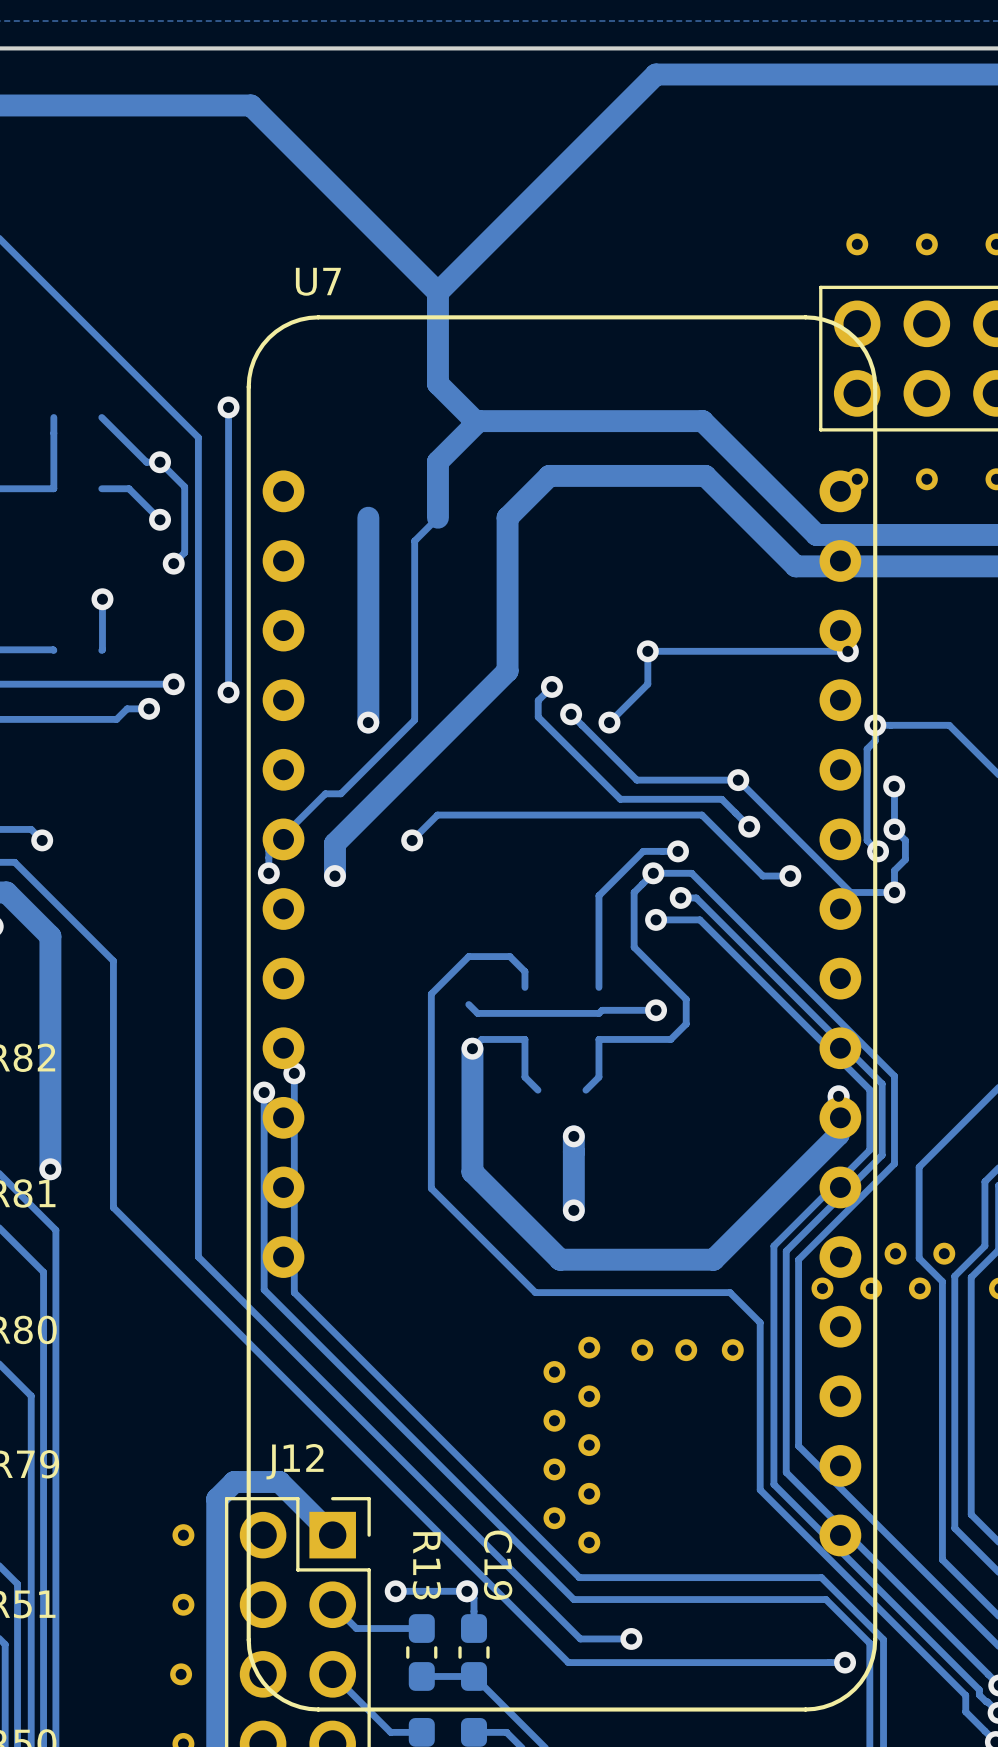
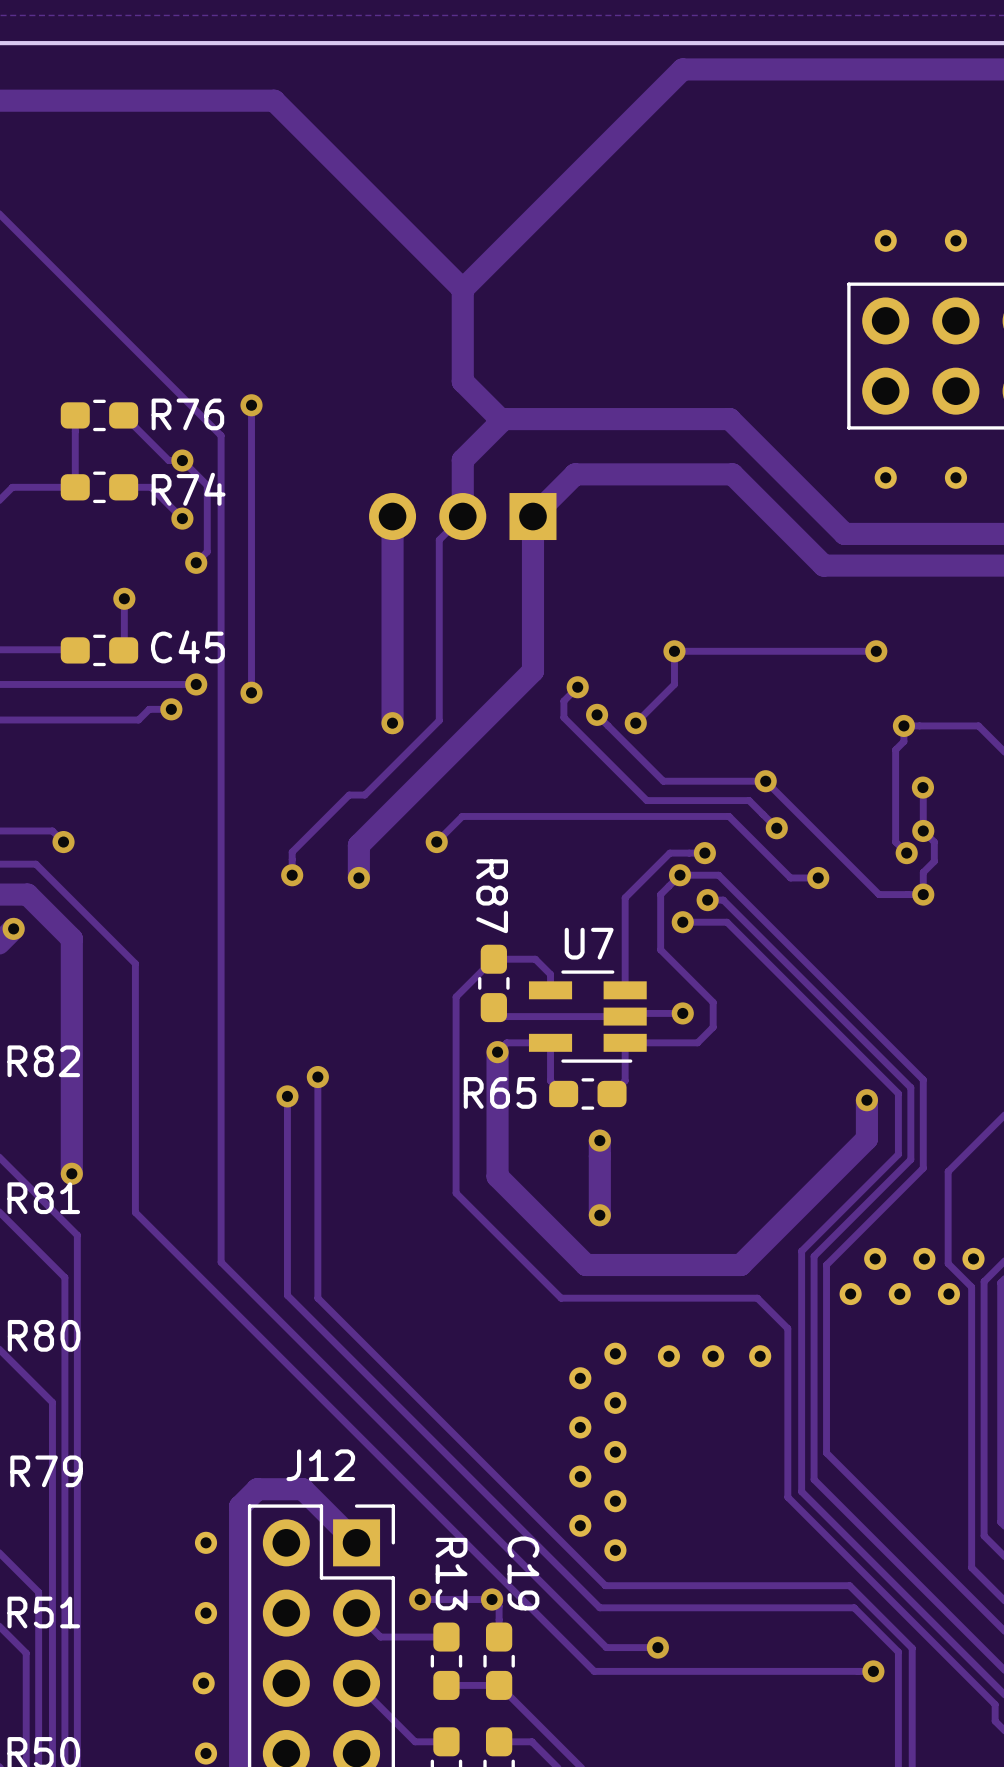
U7 name position: U7 (318, 281) -> U7 (589, 943)
U7 footprint: [246, 315, 878, 1712] -> [528, 970, 647, 1063]
R76: none -> (99, 415)
R74: none -> (99, 487)
part: none -> (462, 516)
C45: none -> (99, 650)
R87: none -> (493, 983)
R65: none -> (587, 1093)

